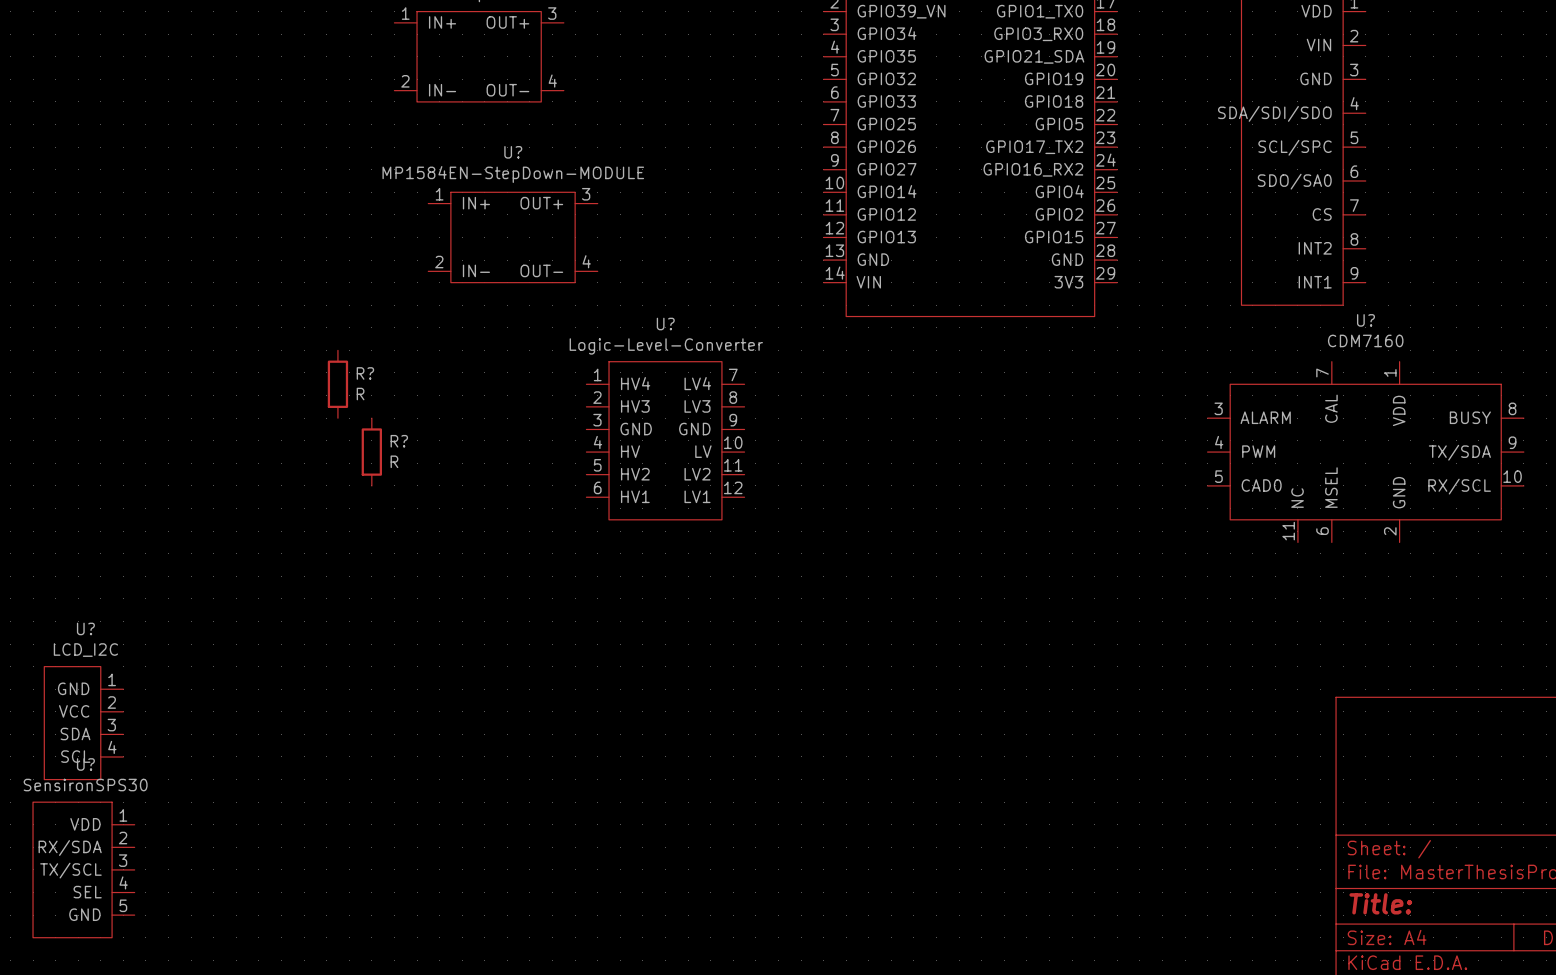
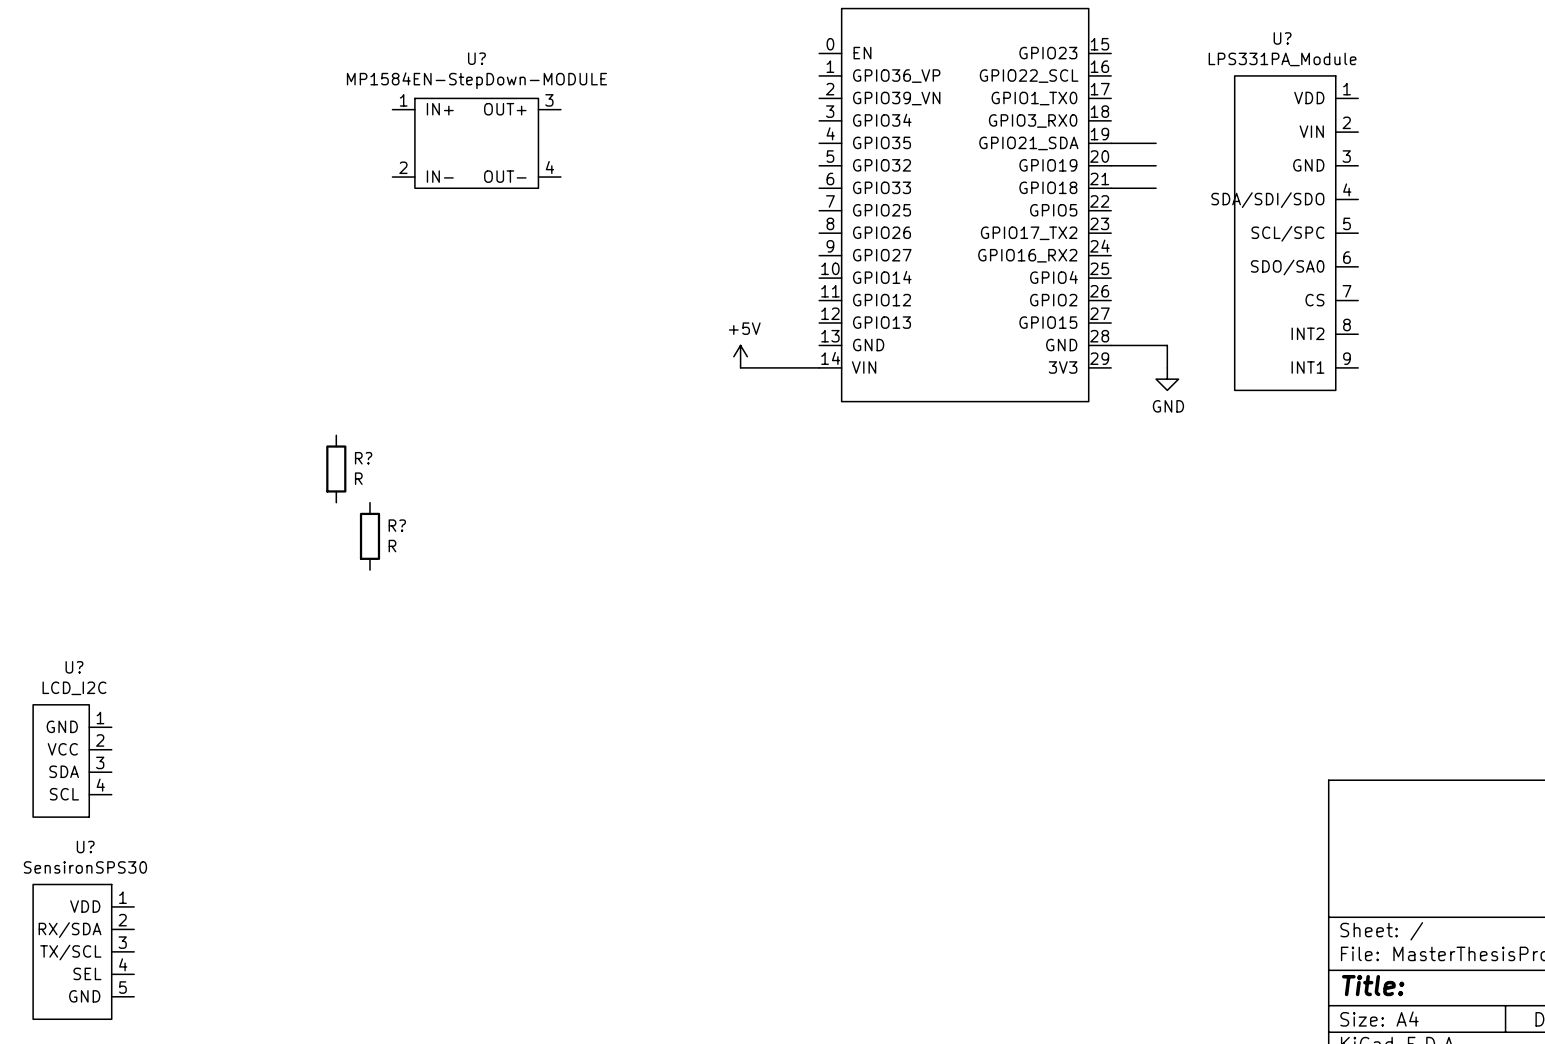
wire: none -> (1111, 143) (1156, 143)
wire: none -> (1111, 165) (1156, 165)
wire: none -> (1111, 188) (1156, 188)
U?: MP1584EN-StepDown-MODULE (513, 237) -> none
wire: none -> (1111, 345) (1167, 345) (1167, 367)
power symbol: none -> +5V (740, 356)
wire: none -> (740, 367) (819, 367)
power symbol: none -> GND (1167, 379)
U?: Logic-Level-Converter (665, 440) -> none
U?: CDM7160 (1365, 452) -> none
U? position: (83, 723) -> (72, 760)

